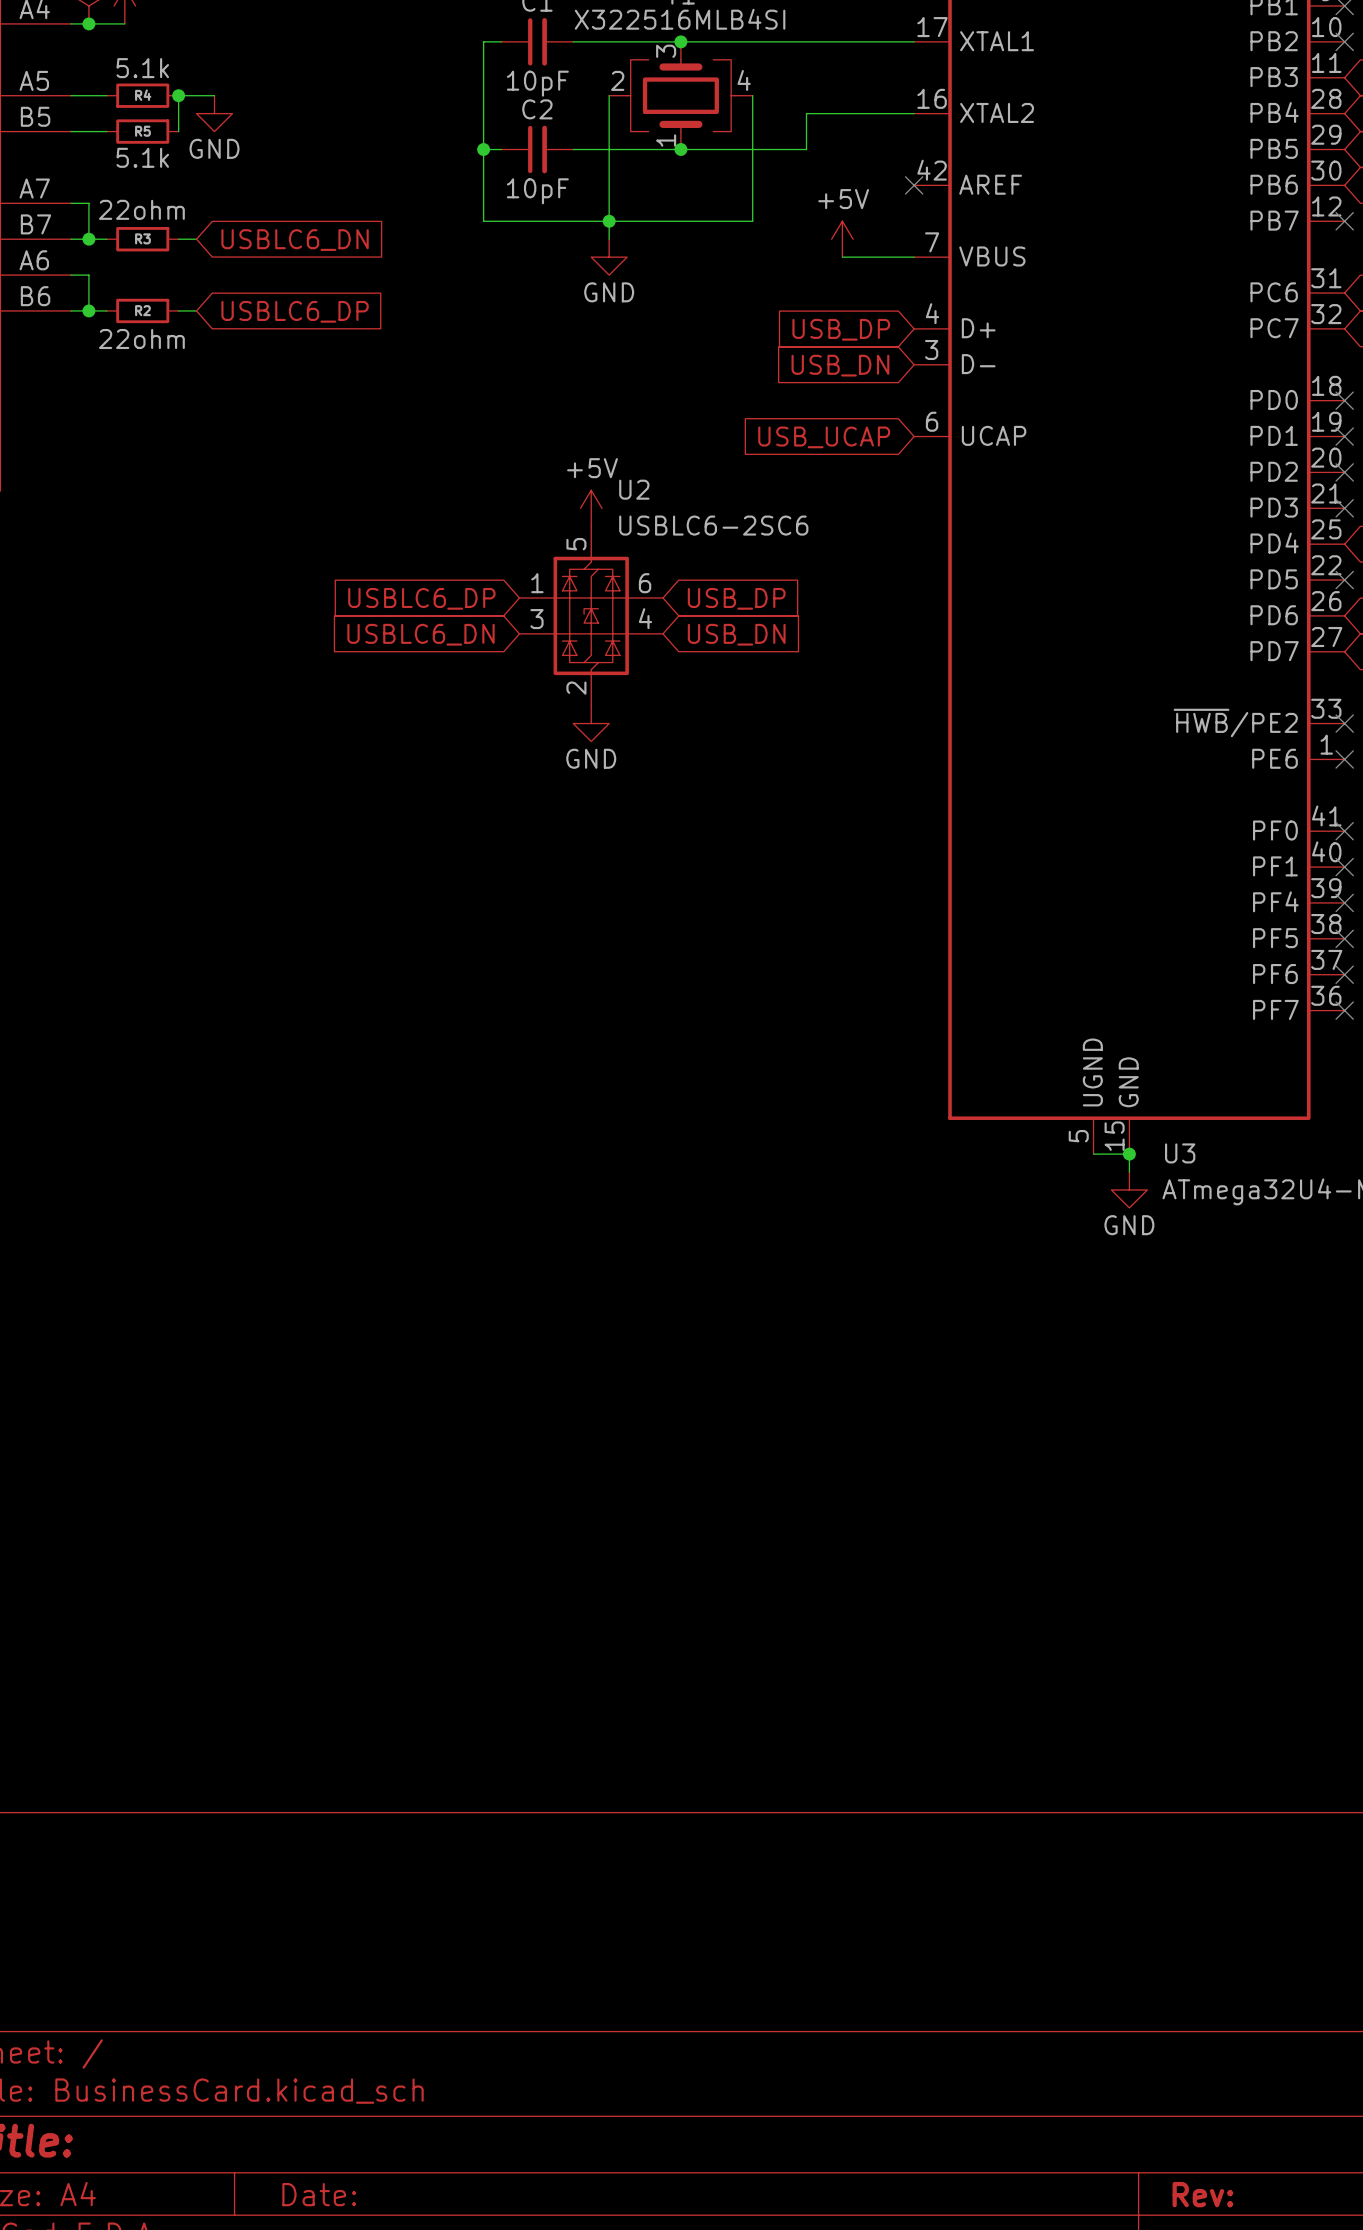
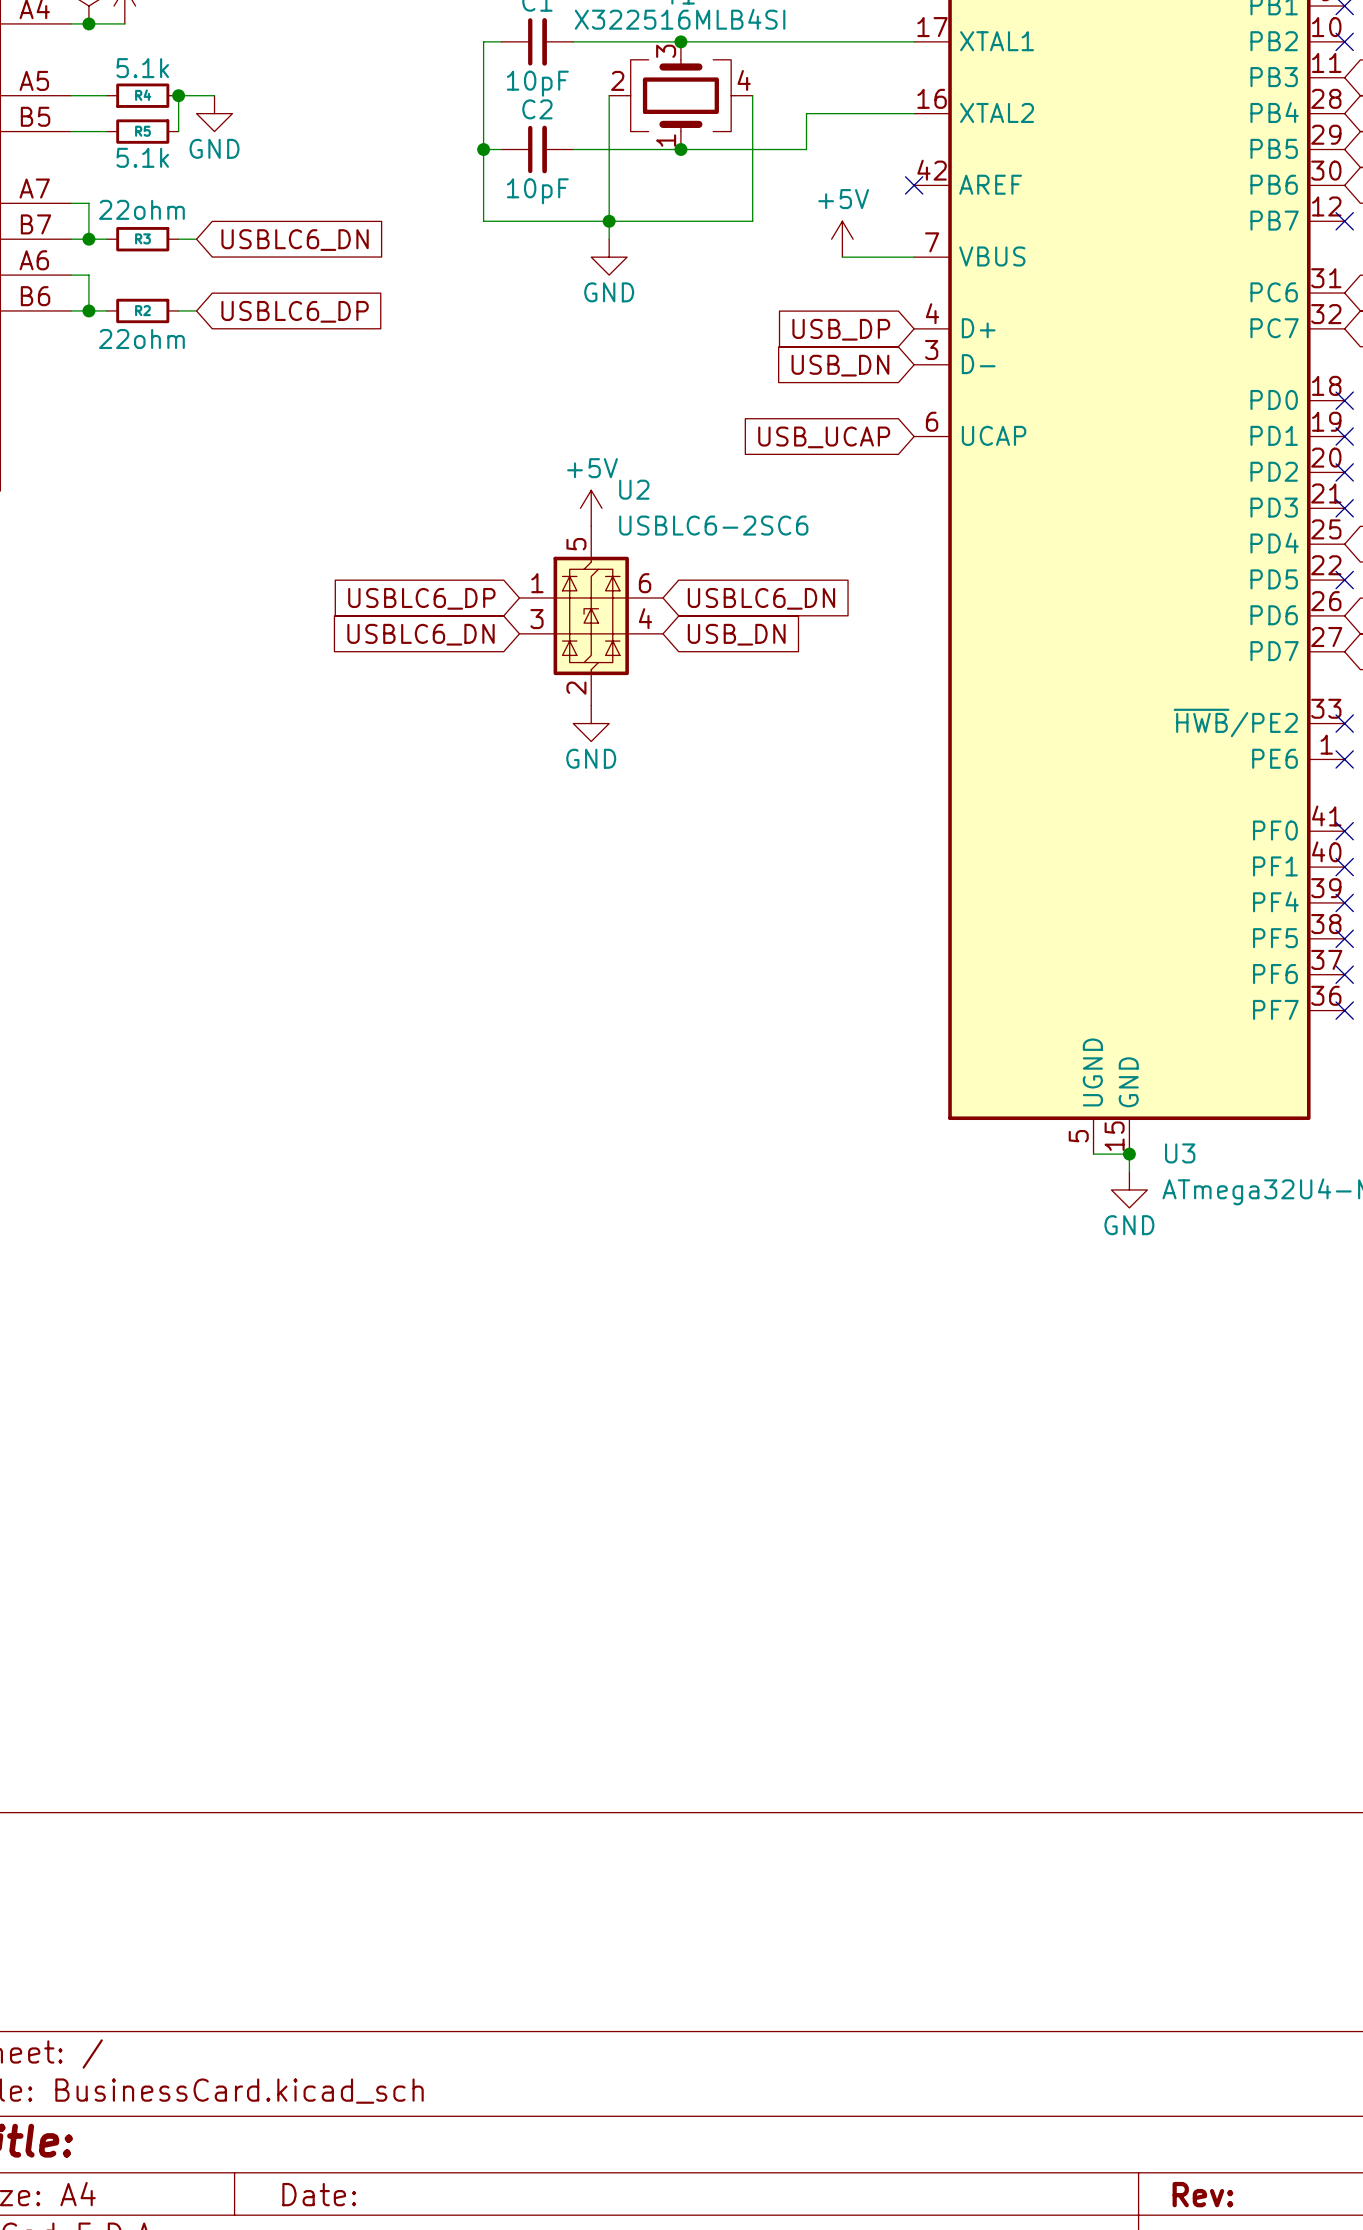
global label: USB_DP (736, 598) -> USBLC6_DN (761, 598)

